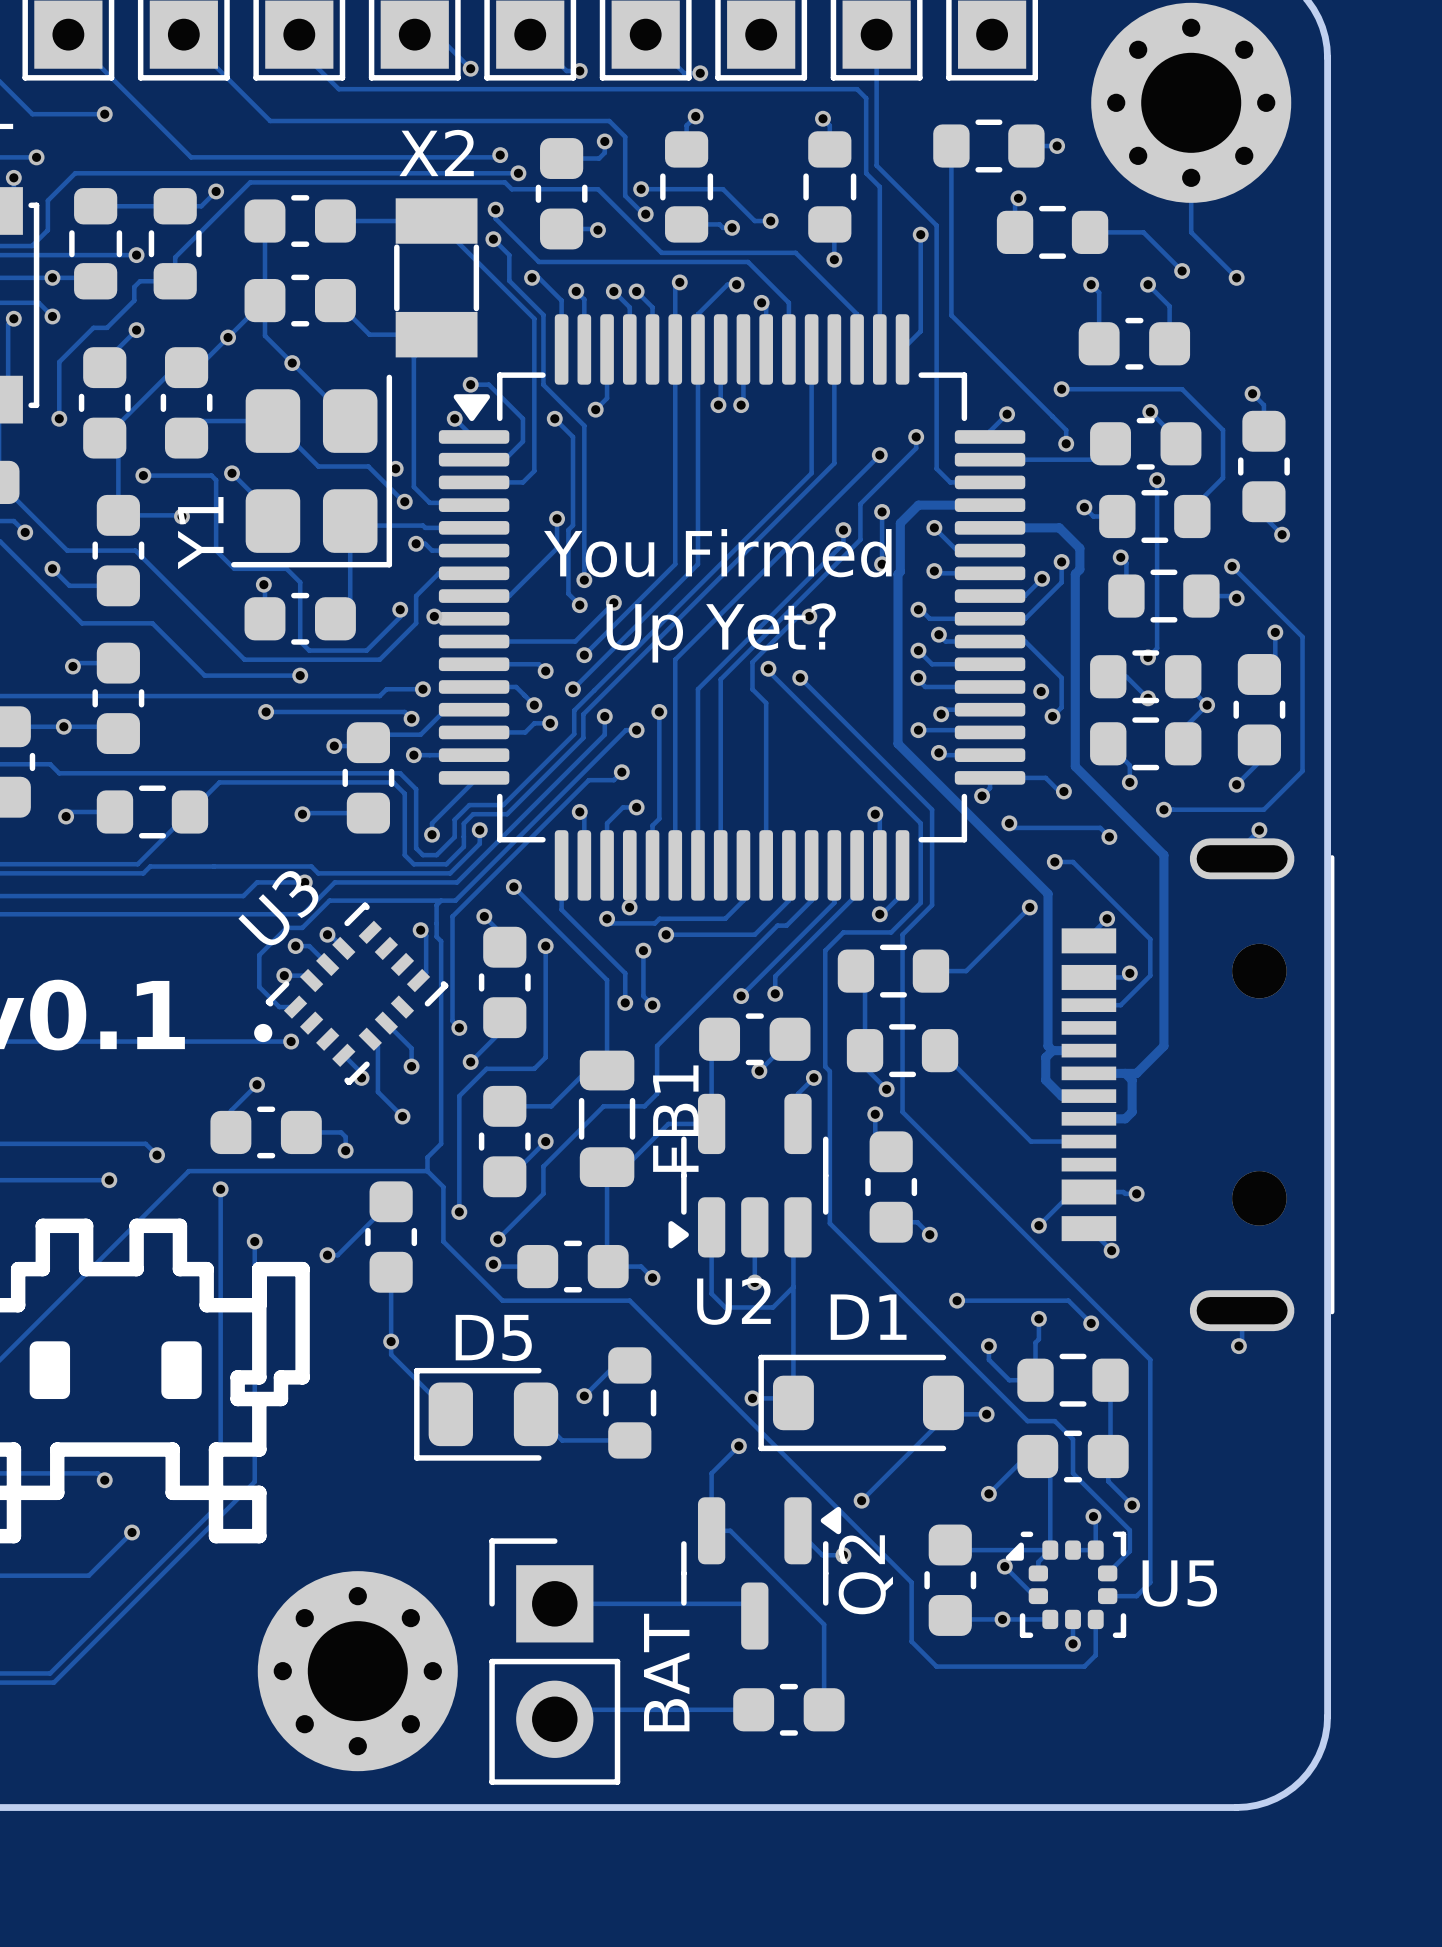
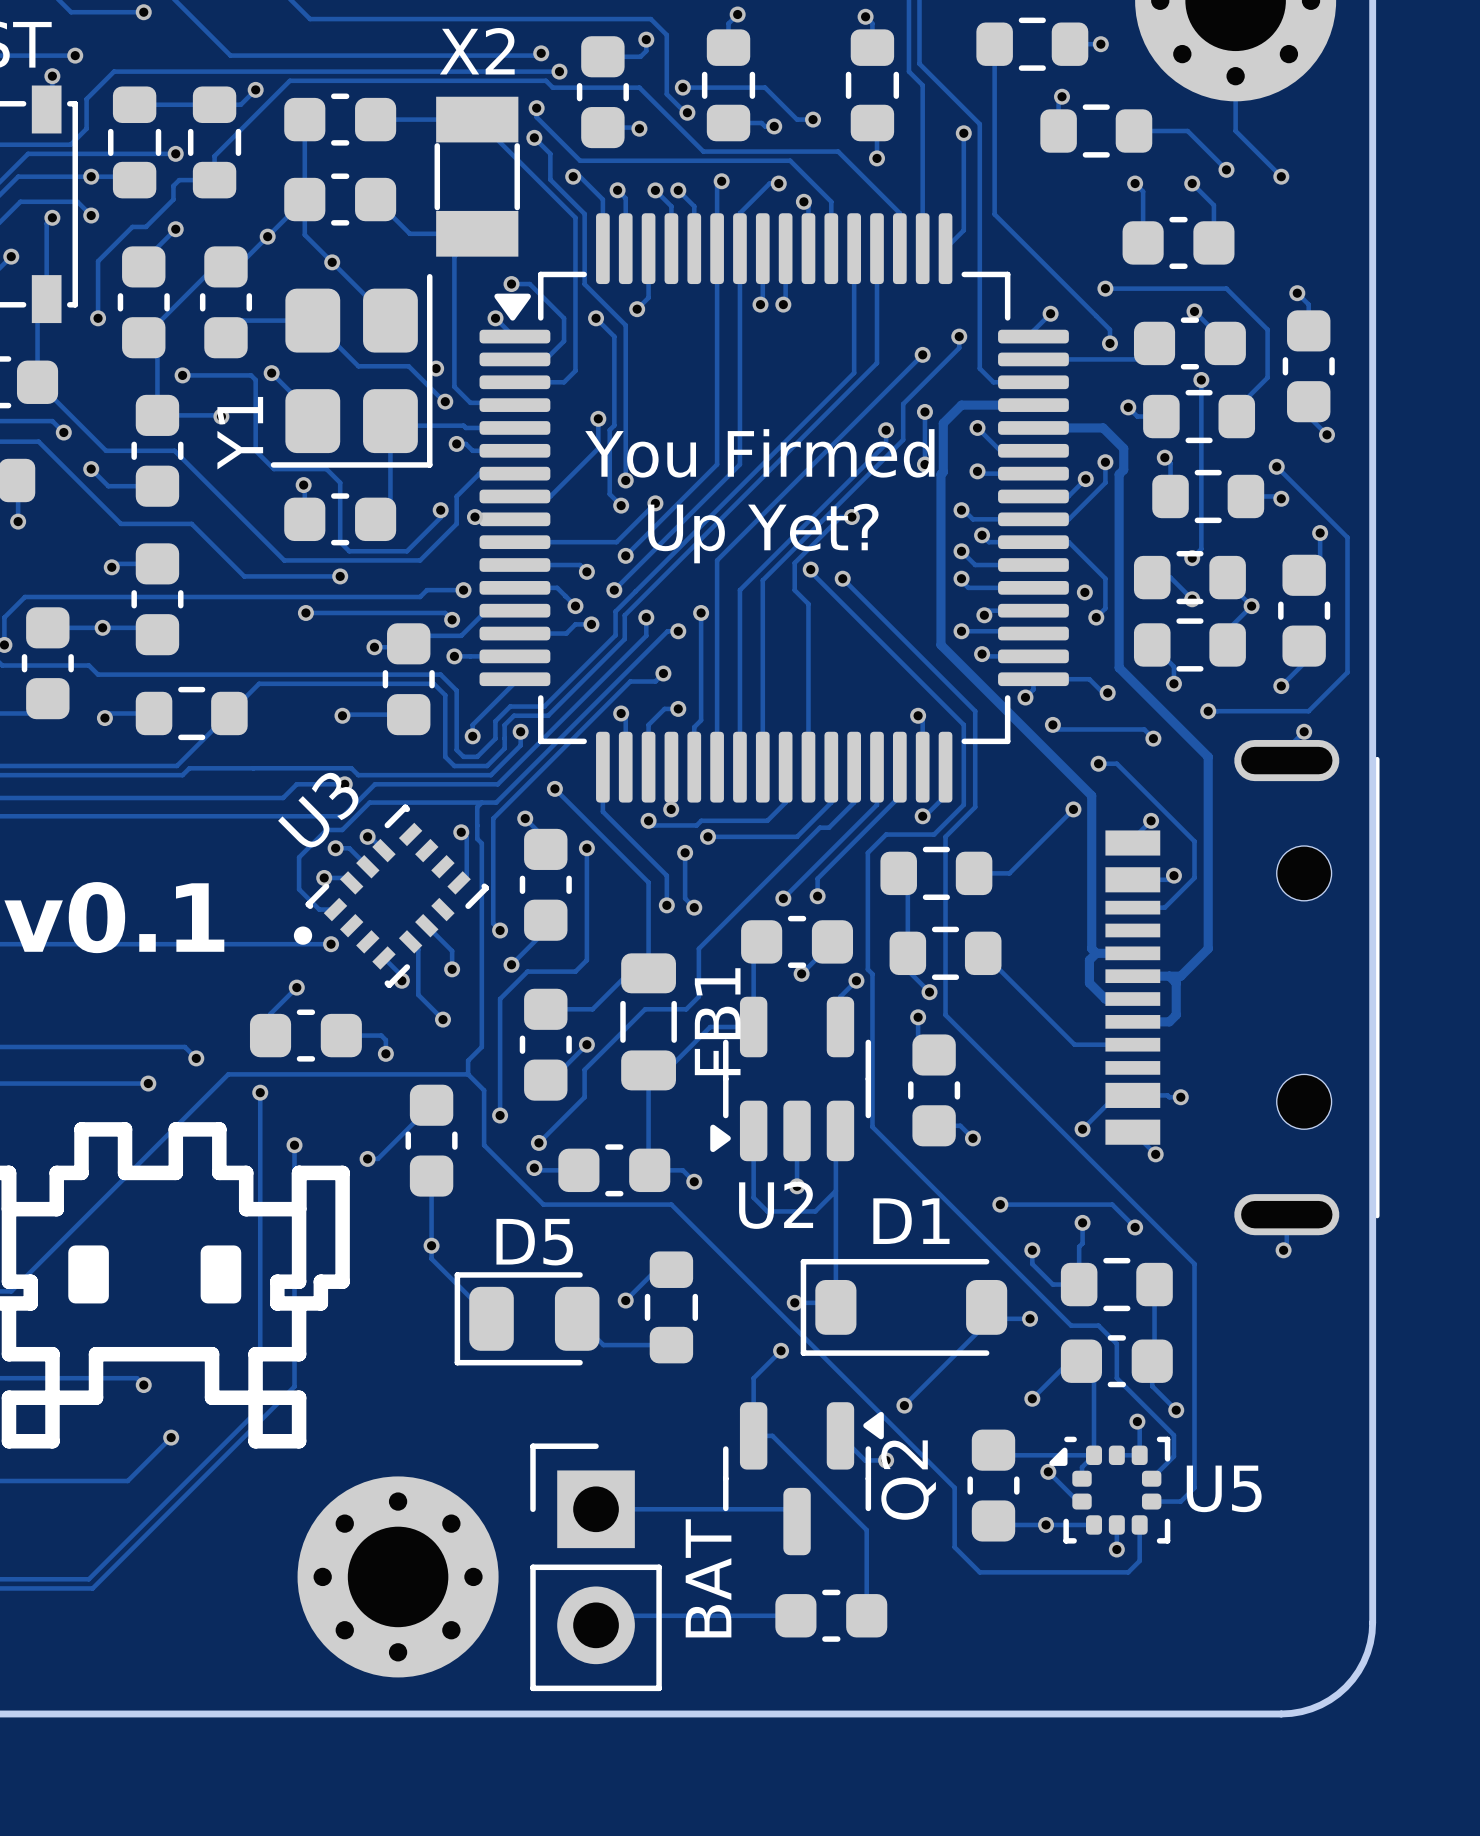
part footprint: [1061, 838, 1335, 1332] -> [1105, 739, 1380, 1236]

